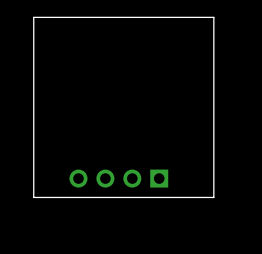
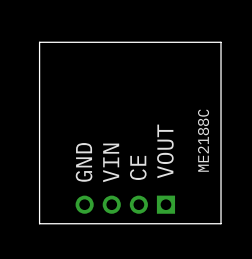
text: none -> ME2188C (203, 140)
text: none -> VOUT (165, 151)
text: none -> GND (84, 162)
text: none -> VIN (111, 162)
text: none -> CE (138, 167)

